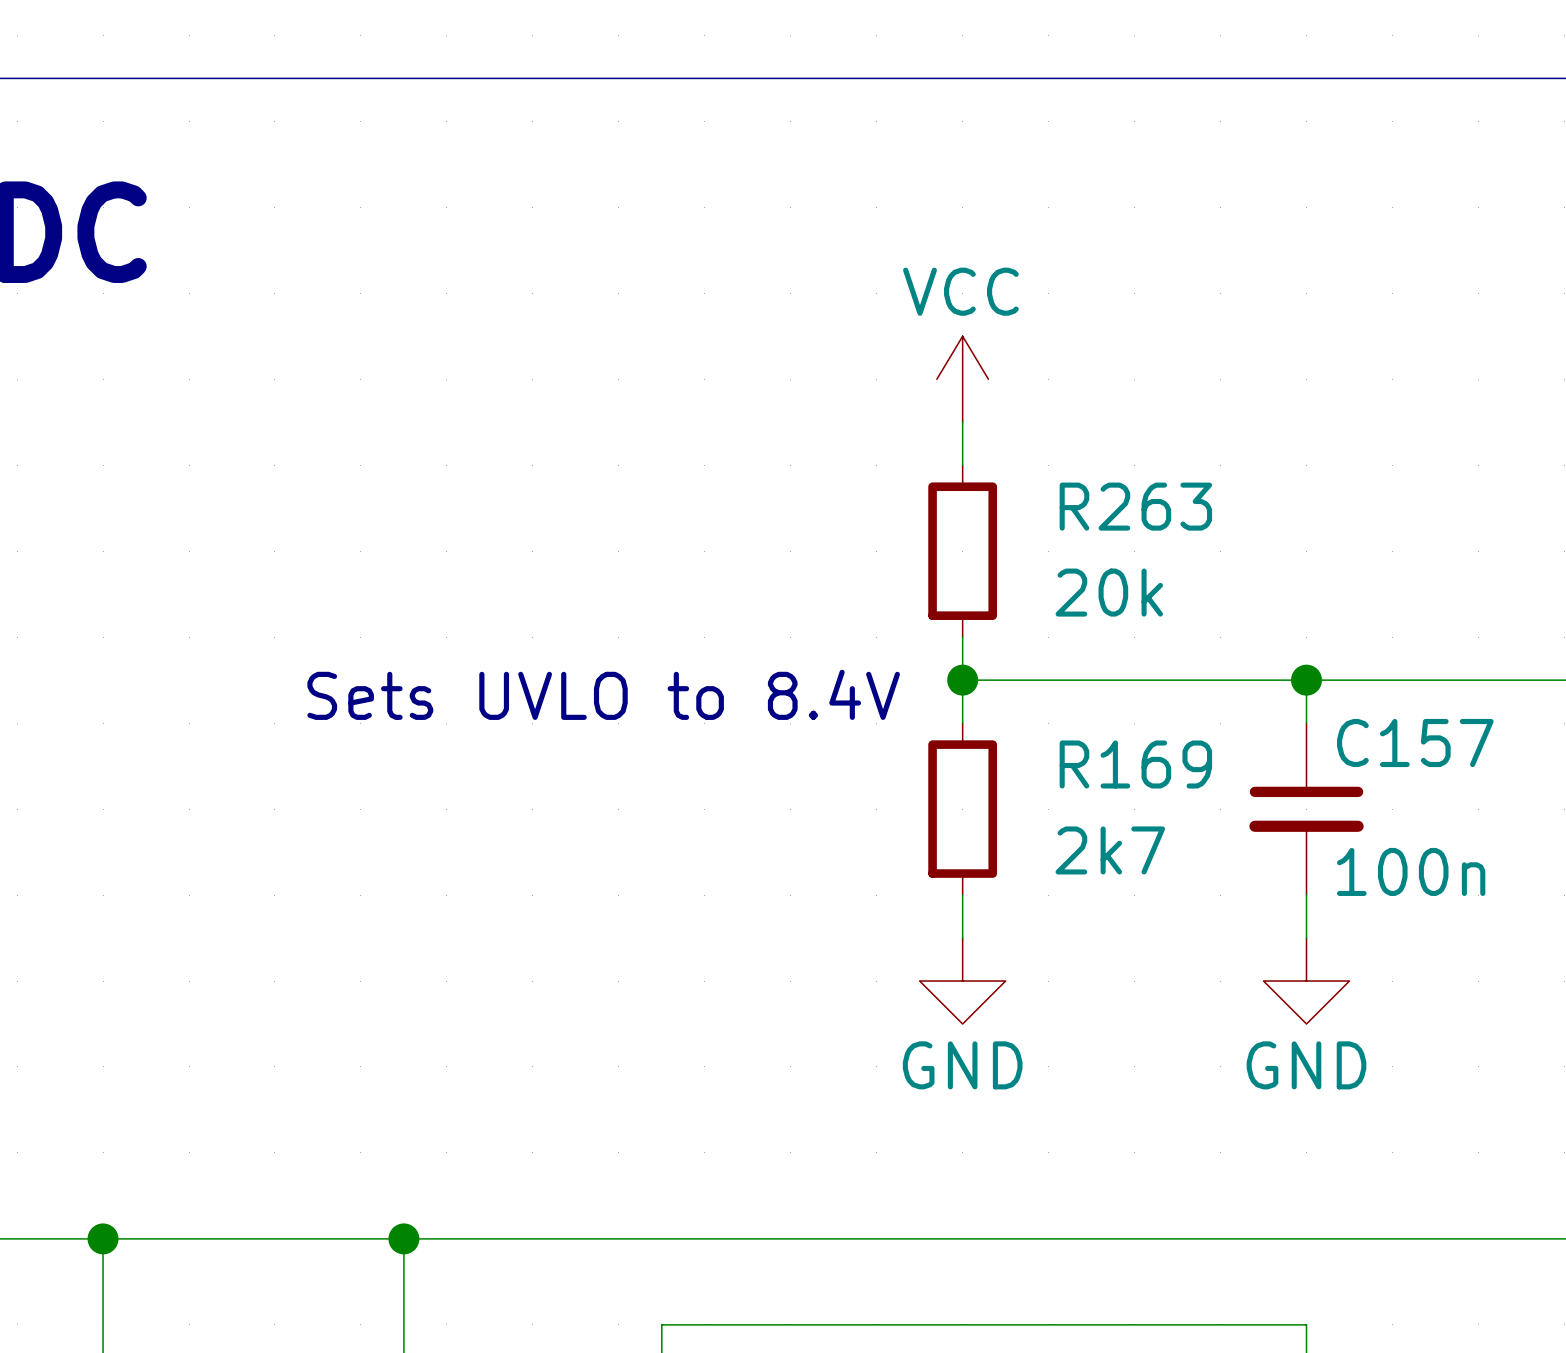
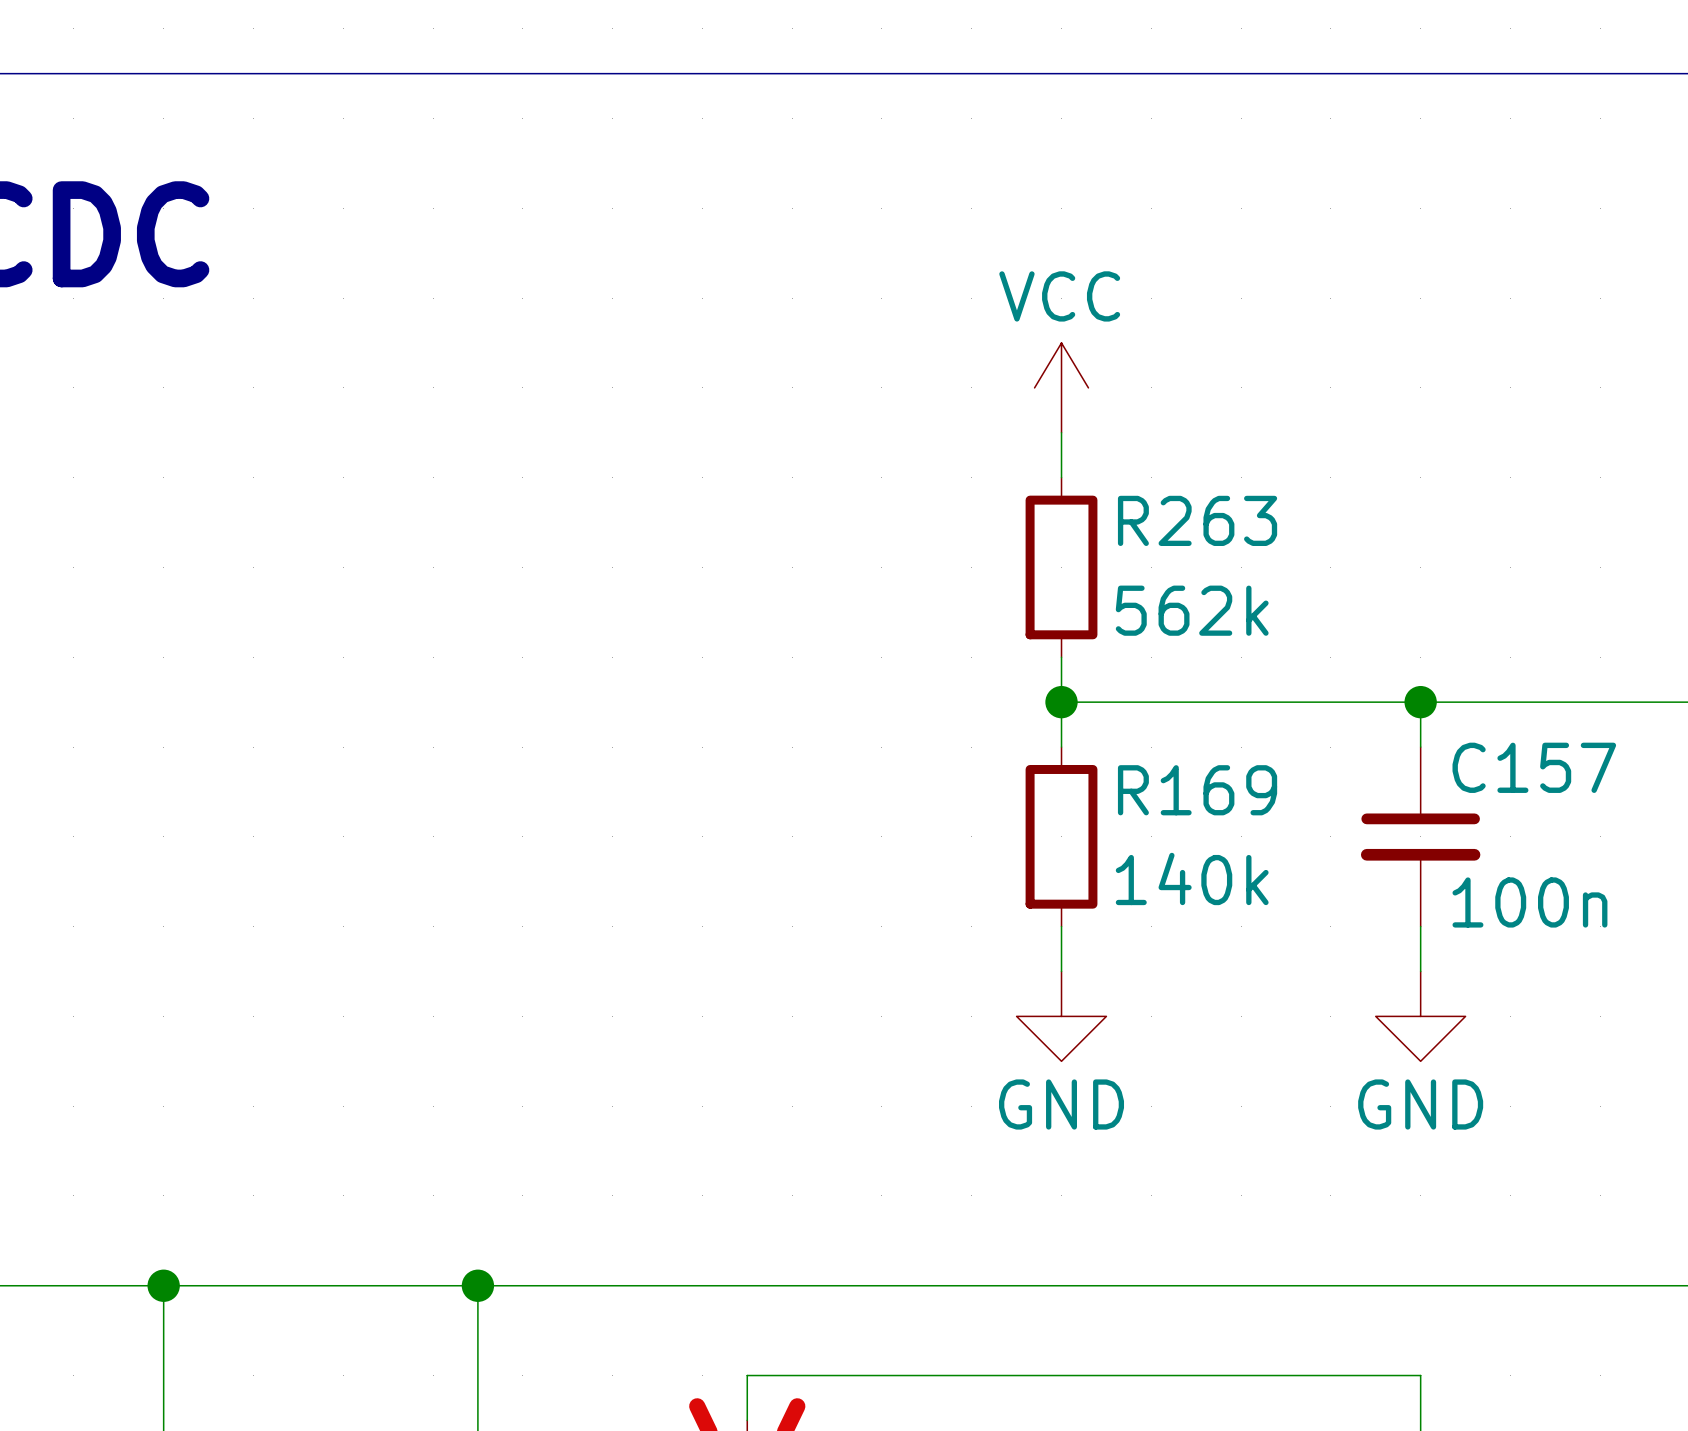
R263 name position: R263 (1135, 506) -> R263 (1197, 520)
R263 text: 20k (1109, 592) -> 562k (1192, 610)
text: Sets UVLO to 8.4V (603, 694) -> none
R169 name position: R169 (1135, 764) -> R169 (1197, 790)
R169 text: 2k7 (1110, 850) -> 140k (1192, 878)

